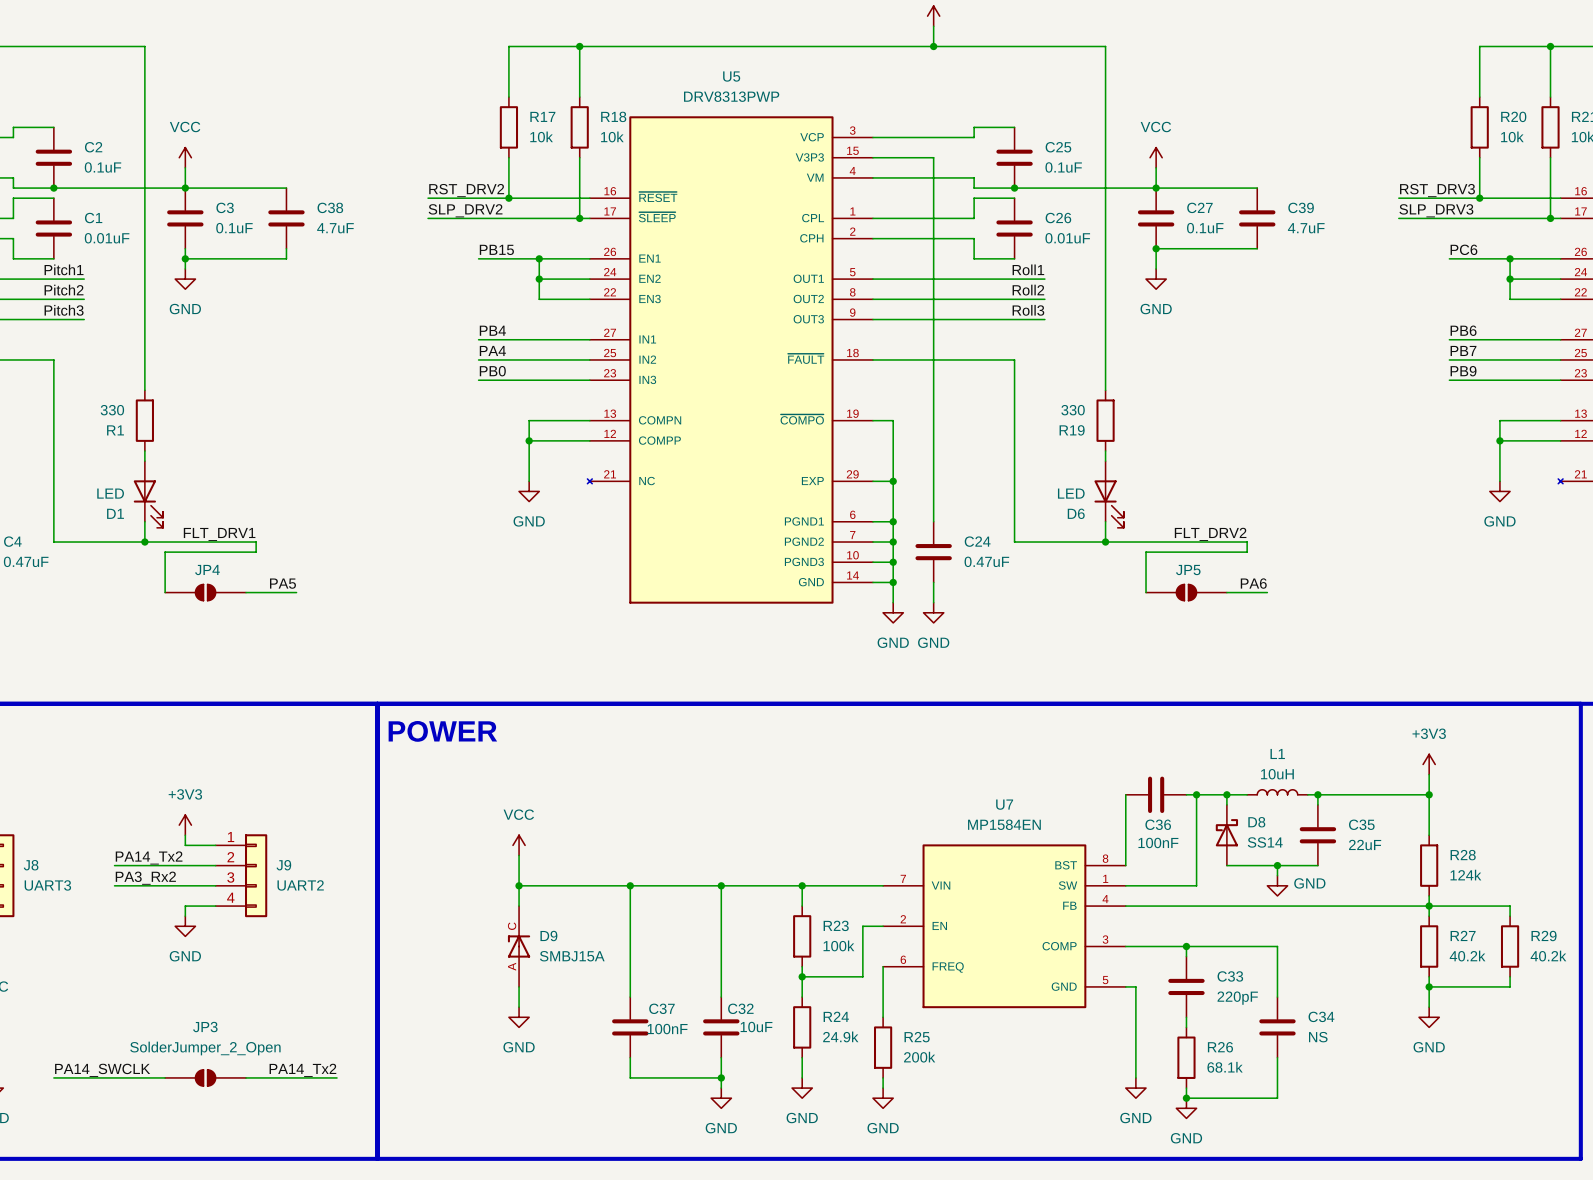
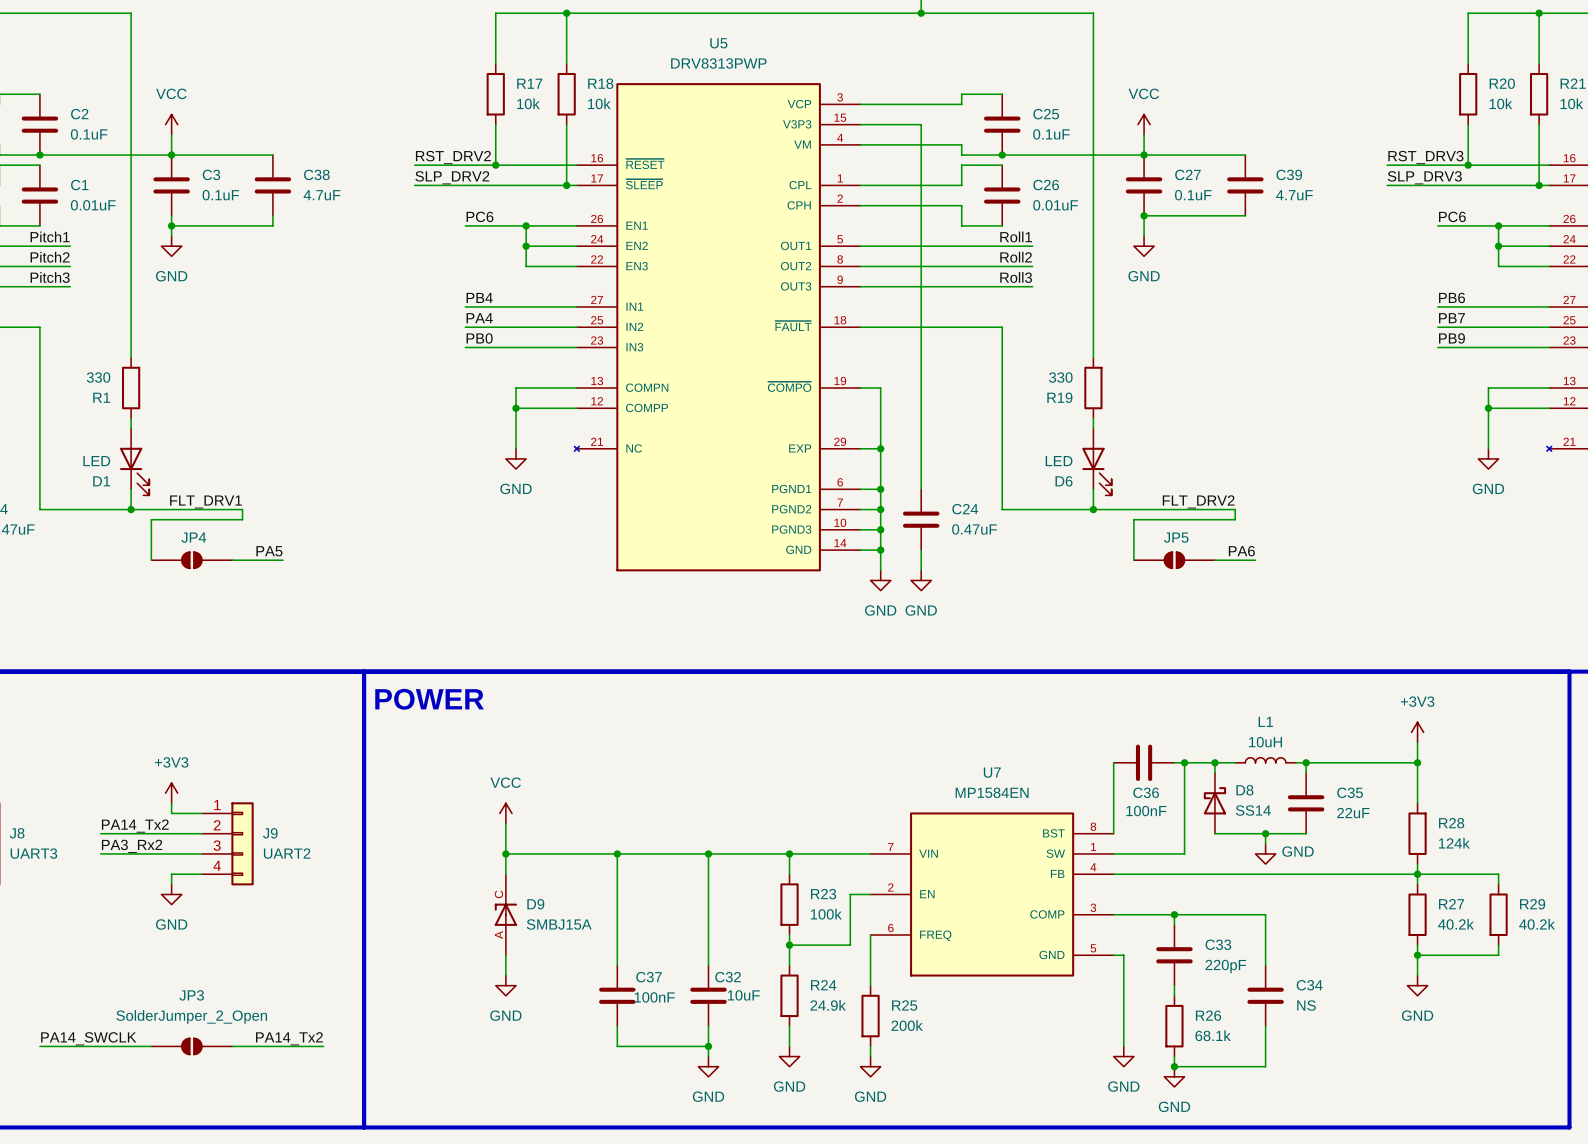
label: PB15 (496, 249) -> PC6 (479, 216)

